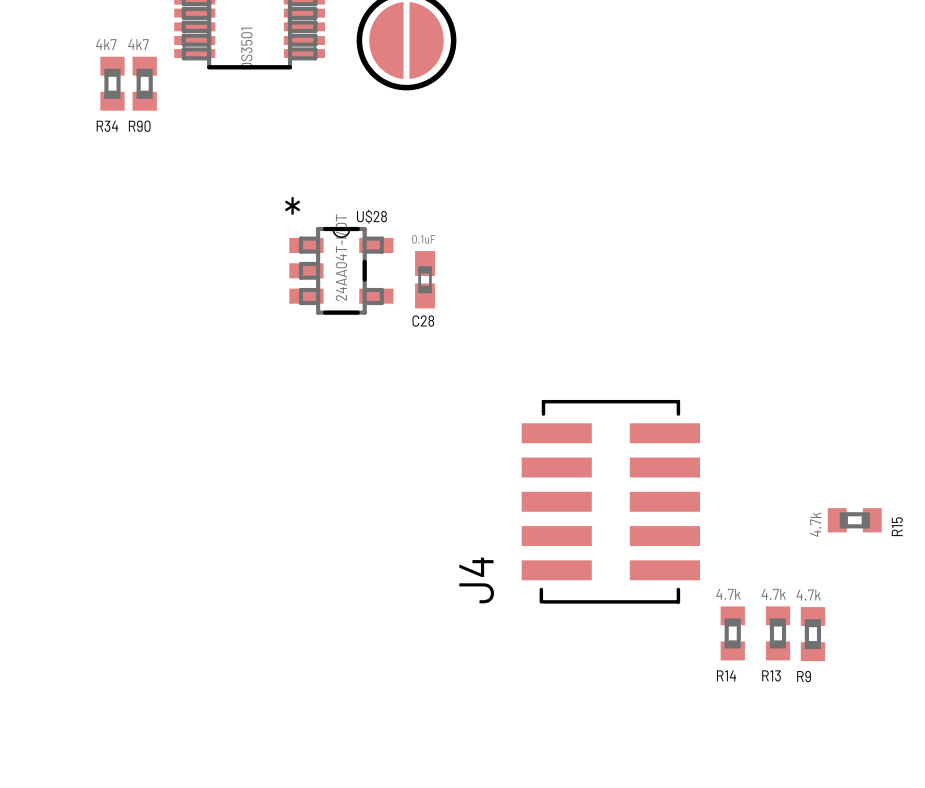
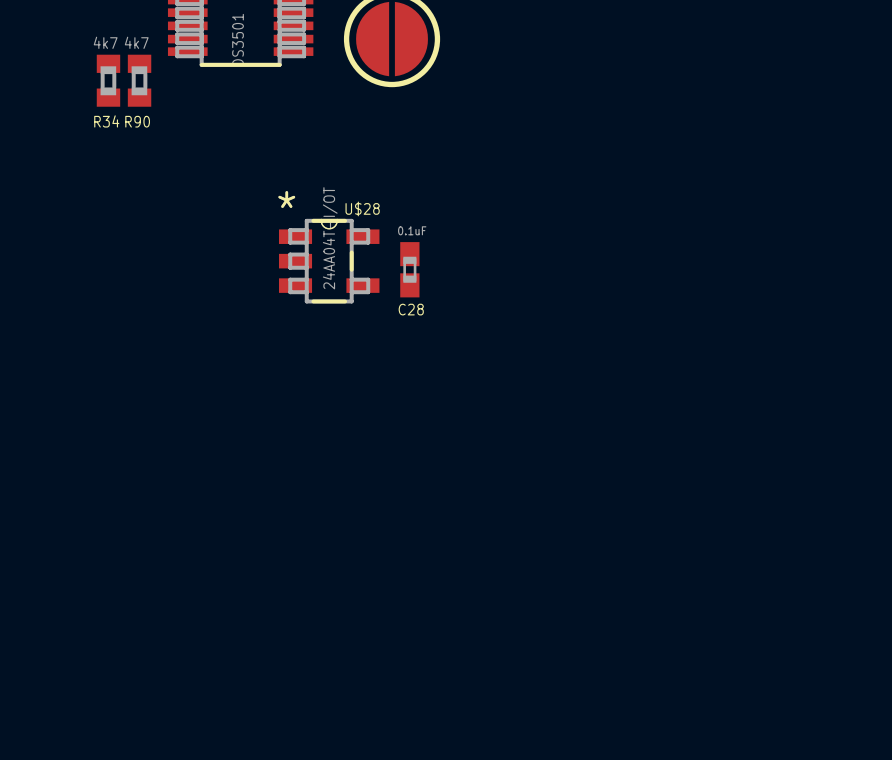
J4: (610, 501) -> none
R15: 4.7k (854, 520) -> none
R14: 4.7k (732, 633) -> none
R13: 4.7k (778, 633) -> none
R9: 4.7k (812, 634) -> none

